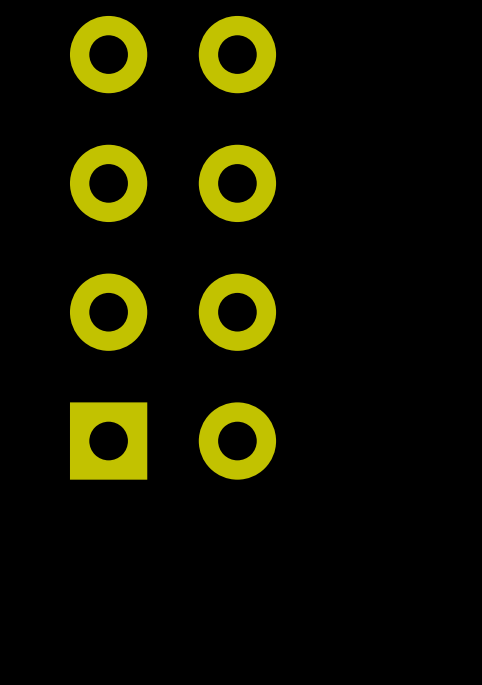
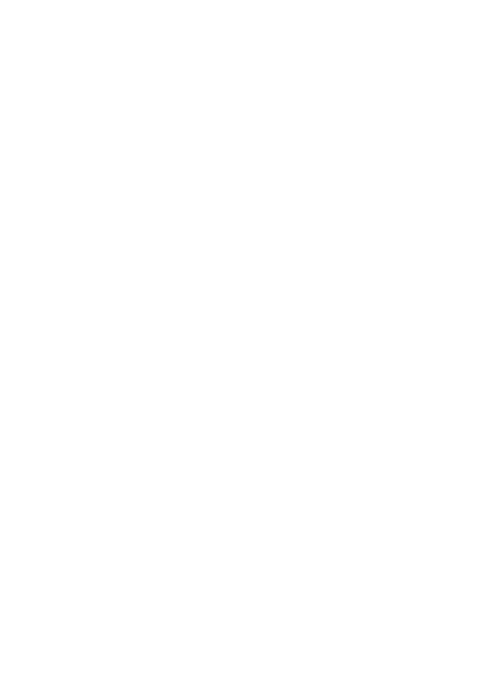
part: (173, 247) -> none

